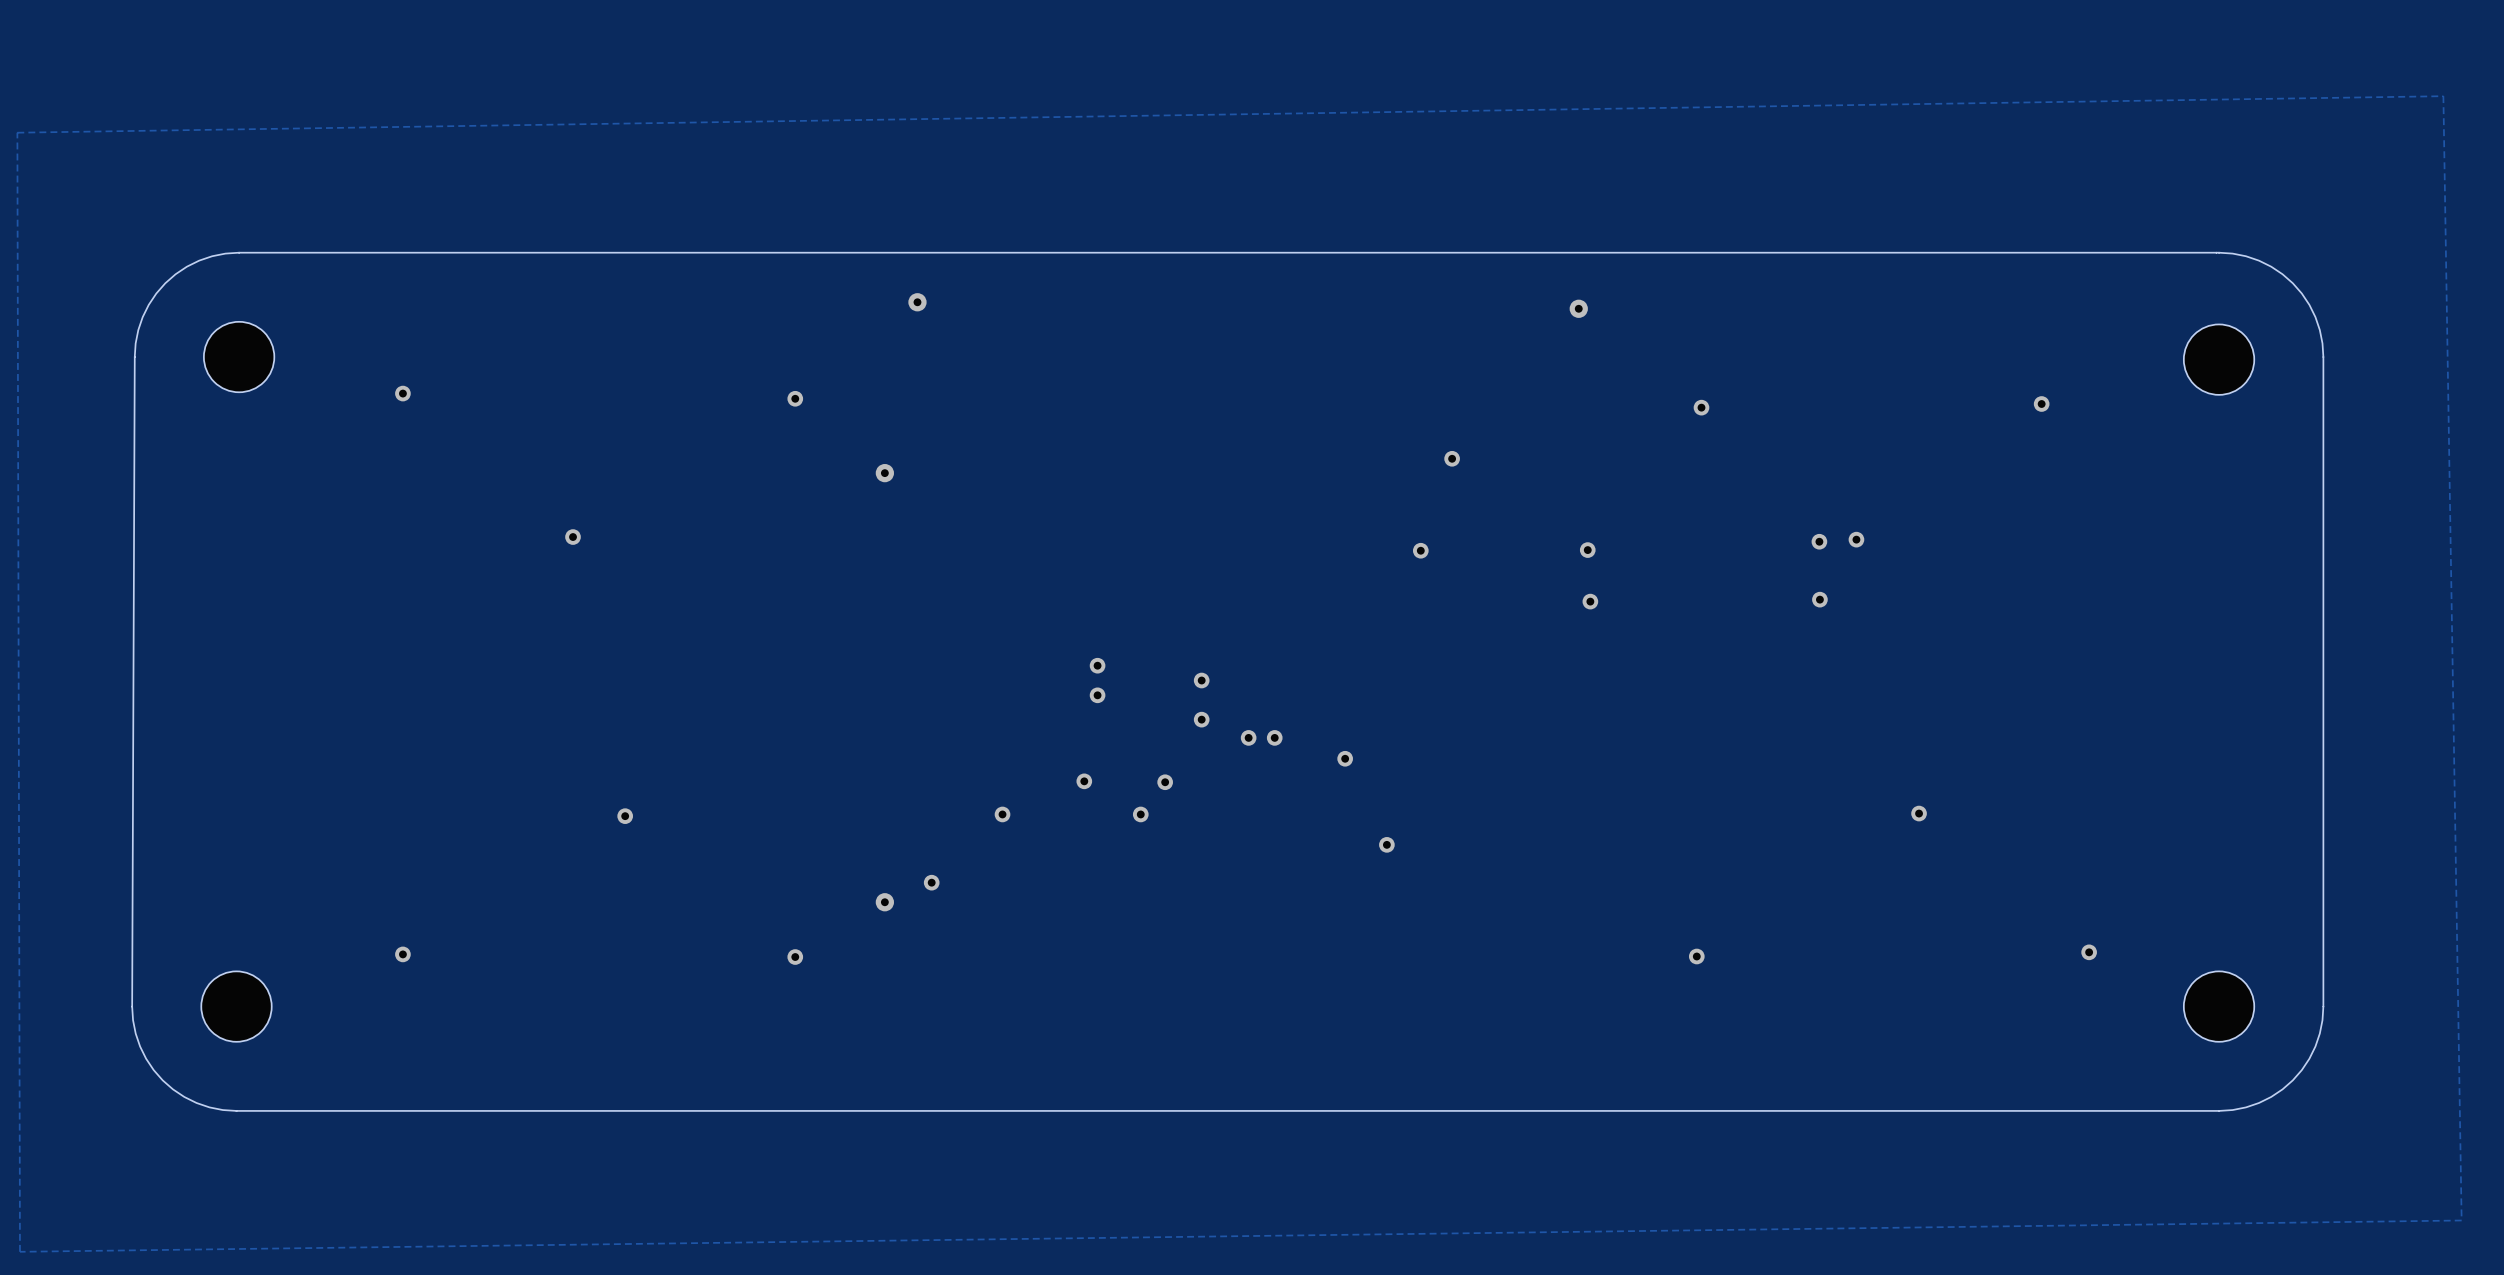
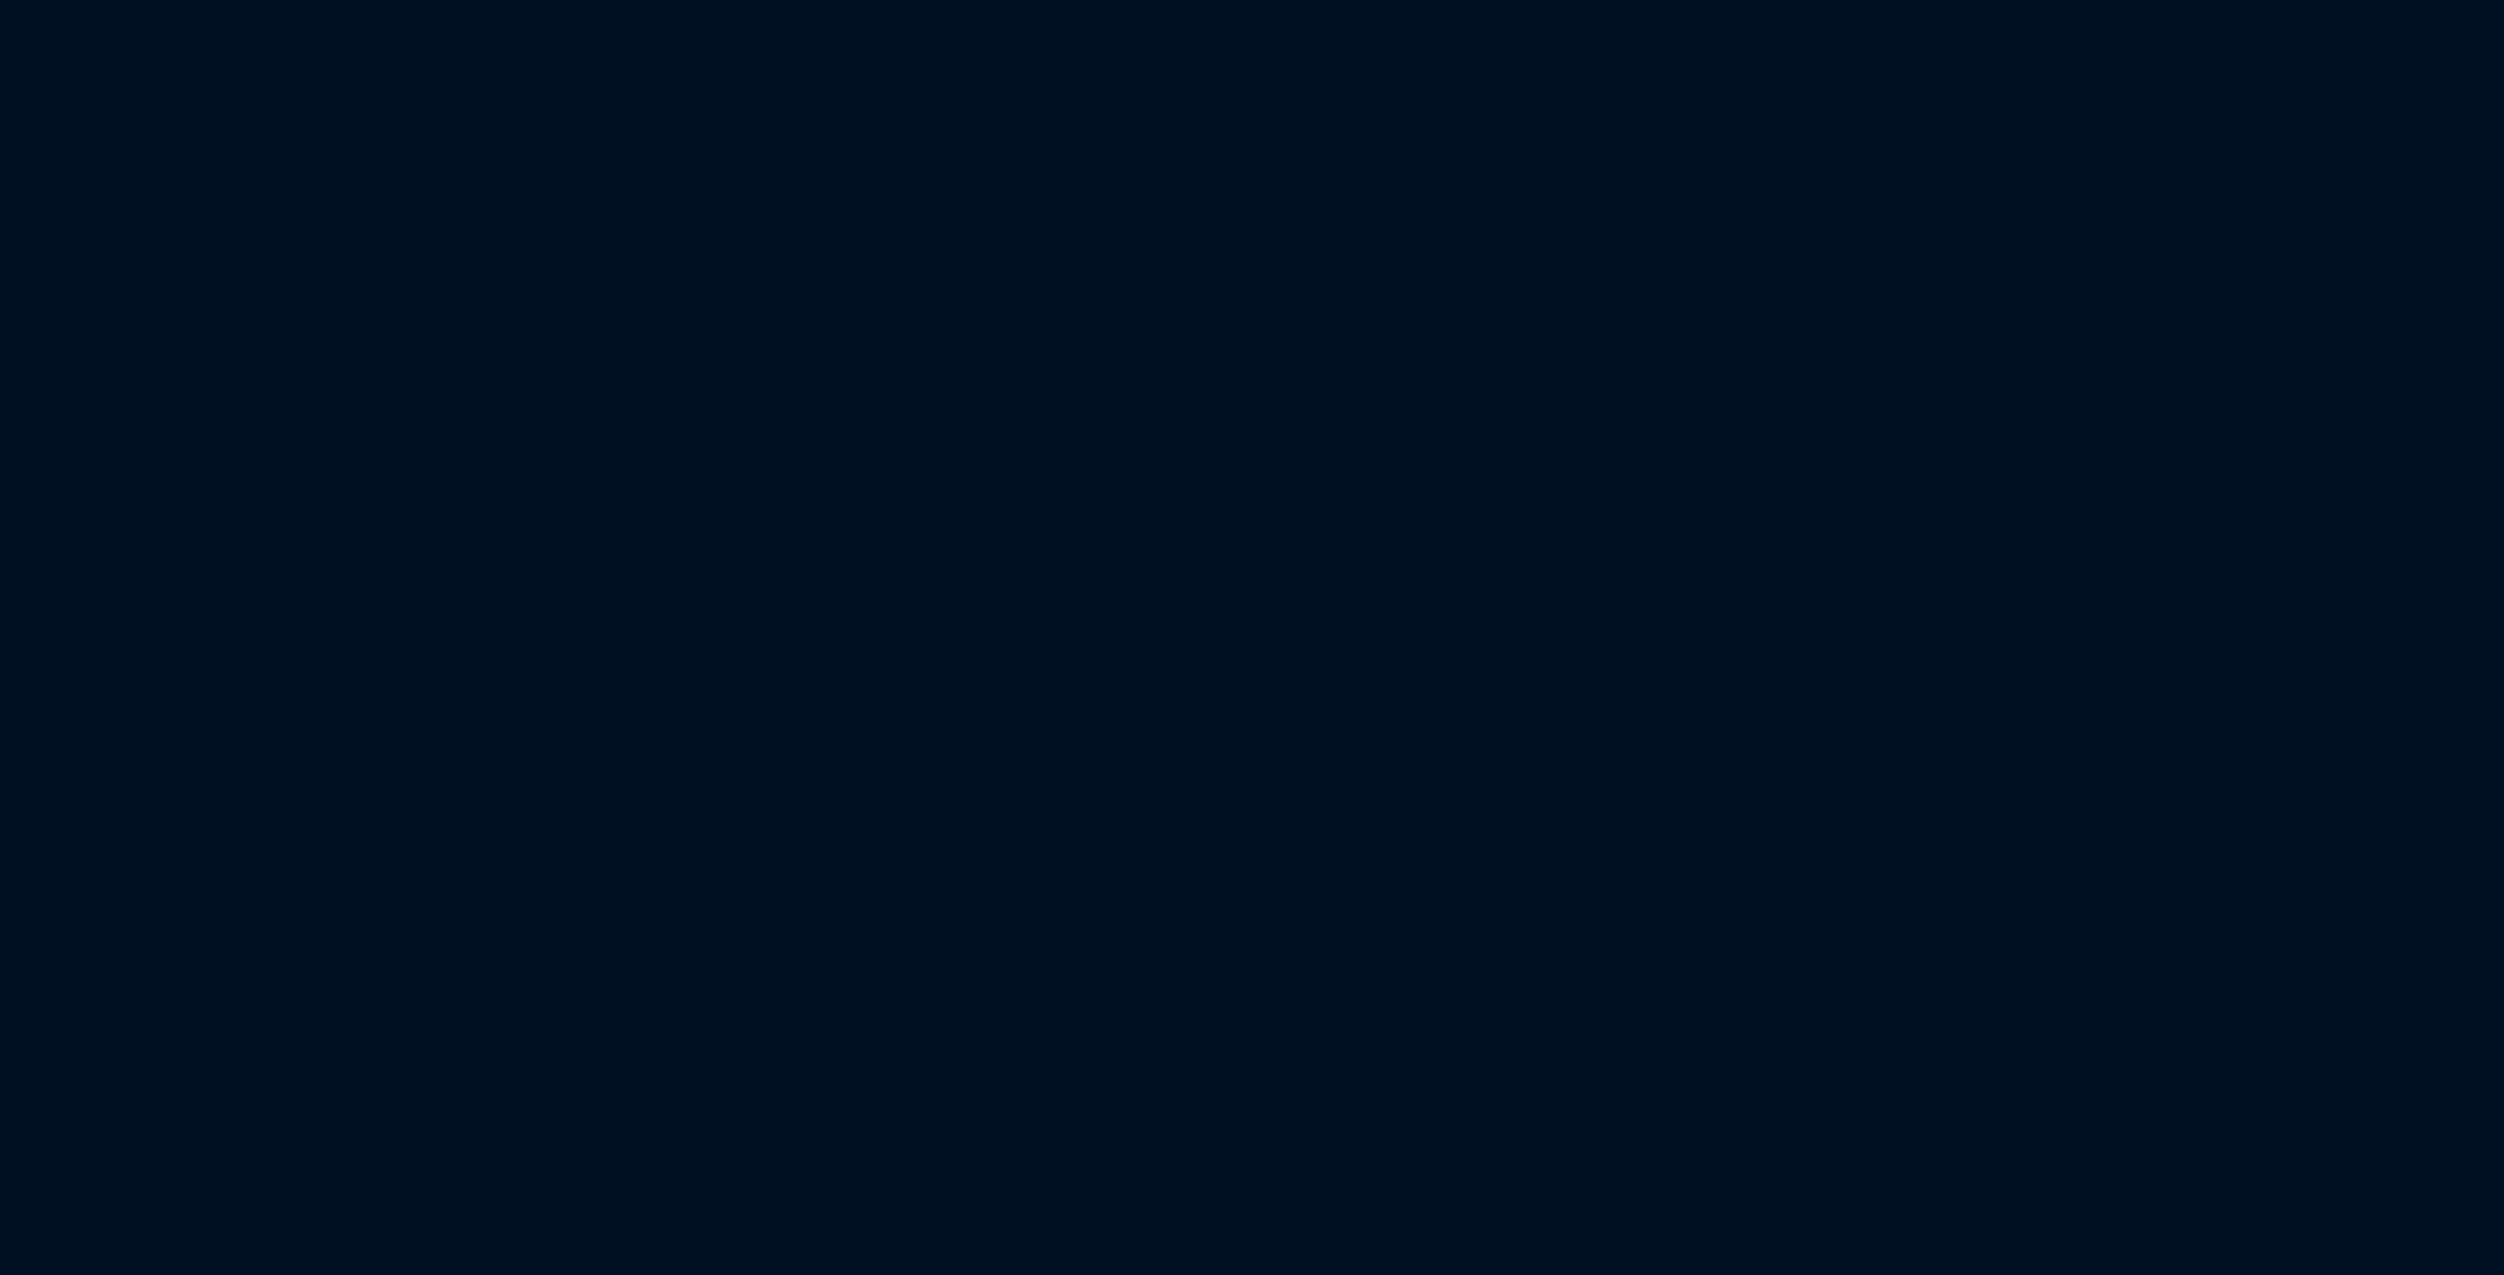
zone outline: (2443, 96) (17, 132) (19, 1251) (2461, 1220) (2443, 96) -> none
board edge: (2219, 252) (239, 252) (212, 256) (199, 260) (175, 274) (156, 293) (142, 317) (135, 343) (132, 1006) (135, 1033) (140, 1046) (153, 1070) (172, 1089) (196, 1102) (209, 1107) (236, 1110) (2219, 1110) (2246, 1107) (2258, 1102) (2282, 1089) (2301, 1070) (2315, 1046) (2322, 1020) (2323, 357) (2319, 330) (2315, 317) (2309, 304) (2292, 283) (2271, 266) (2258, 260) (2232, 253) (2219, 252) -> none
via: (917, 302) -> none
via: (1578, 308) -> none
part: (239, 357) -> none
part: (2219, 359) -> none
via: (402, 393) -> none
via: (795, 398) -> none
via: (2041, 404) -> none
via: (1701, 407) -> none
via: (1452, 458) -> none
via: (884, 473) -> none
via: (573, 537) -> none
via: (1856, 539) -> none
via: (1819, 541) -> none
via: (1420, 550) -> none
via: (1587, 550) -> none
via: (1819, 599) -> none
via: (1590, 601) -> none
via: (1097, 665) -> none
via: (1201, 680) -> none
via: (1097, 695) -> none
via: (1201, 719) -> none
via: (1248, 737) -> none
via: (1274, 737) -> none
via: (1345, 758) -> none
via: (1084, 781) -> none
via: (1165, 782) -> none
via: (1919, 813) -> none
via: (1002, 814) -> none
via: (1140, 814) -> none
via: (625, 816) -> none
via: (1386, 844) -> none
via: (931, 882) -> none
via: (884, 902) -> none
via: (2089, 952) -> none
via: (402, 954) -> none
via: (1696, 956) -> none
via: (795, 957) -> none
part: (236, 1006) -> none
part: (2219, 1006) -> none

